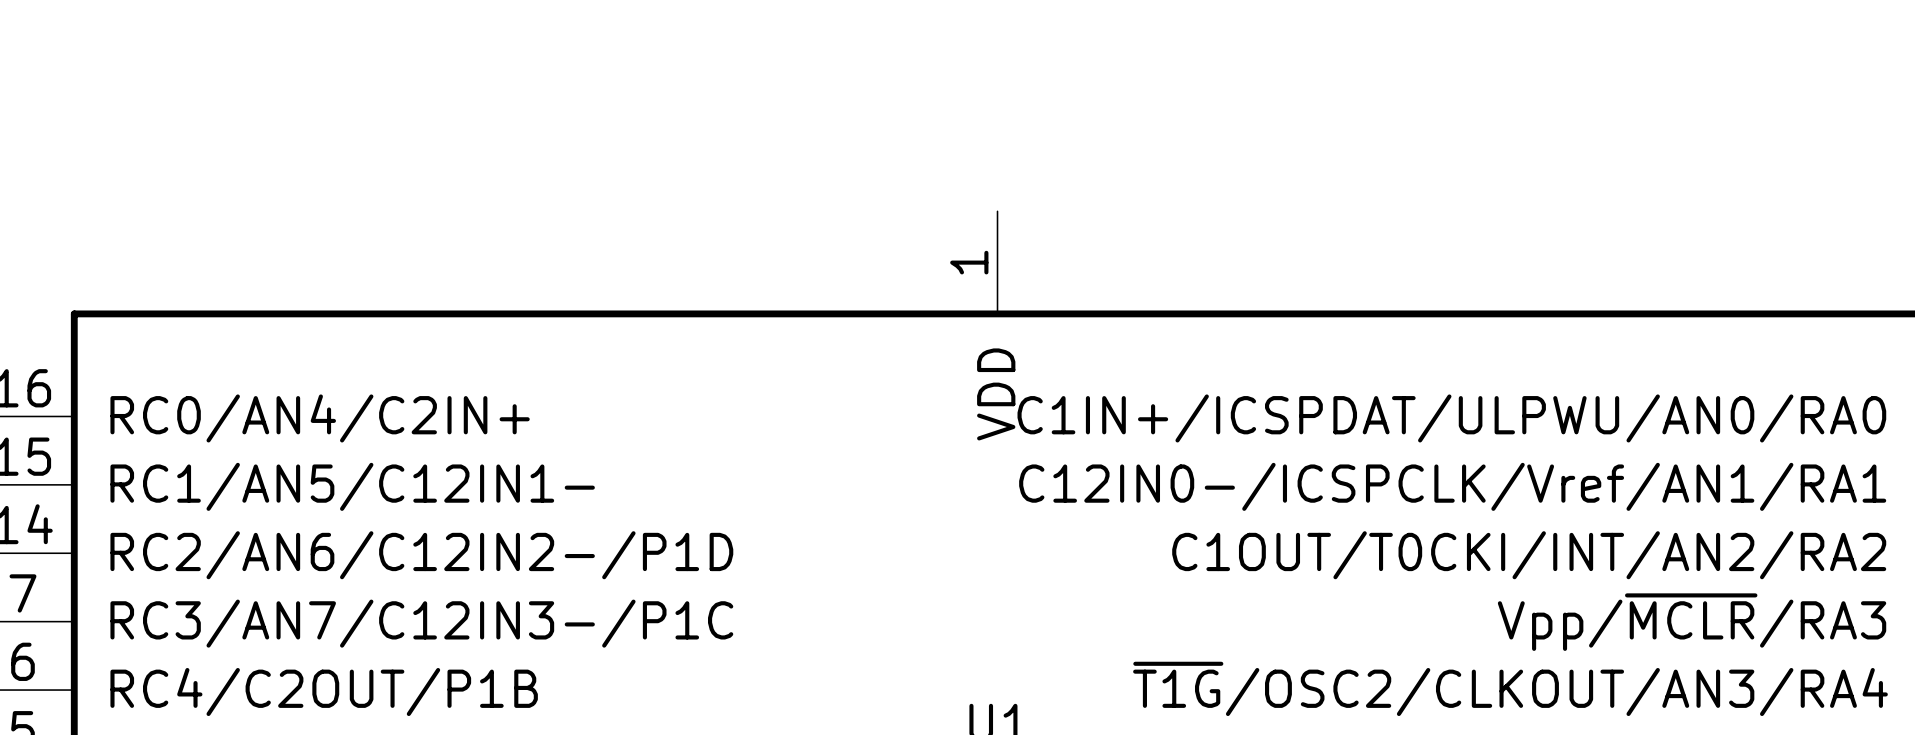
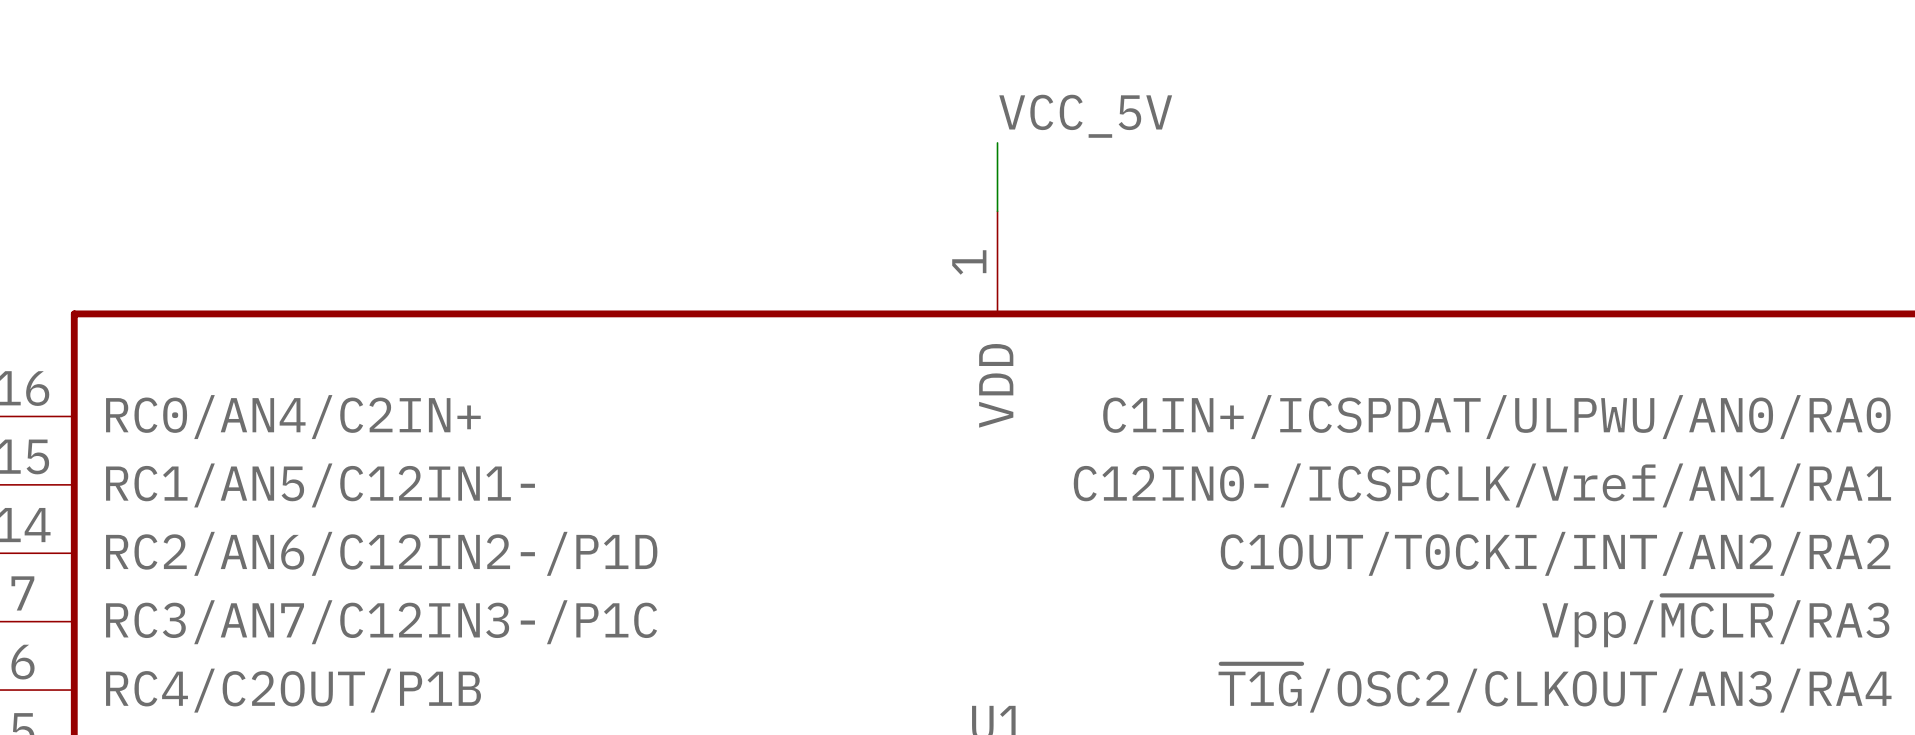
label: none -> VCC_5V (1085, 116)
wire: none -> (997, 142) (997, 211)

